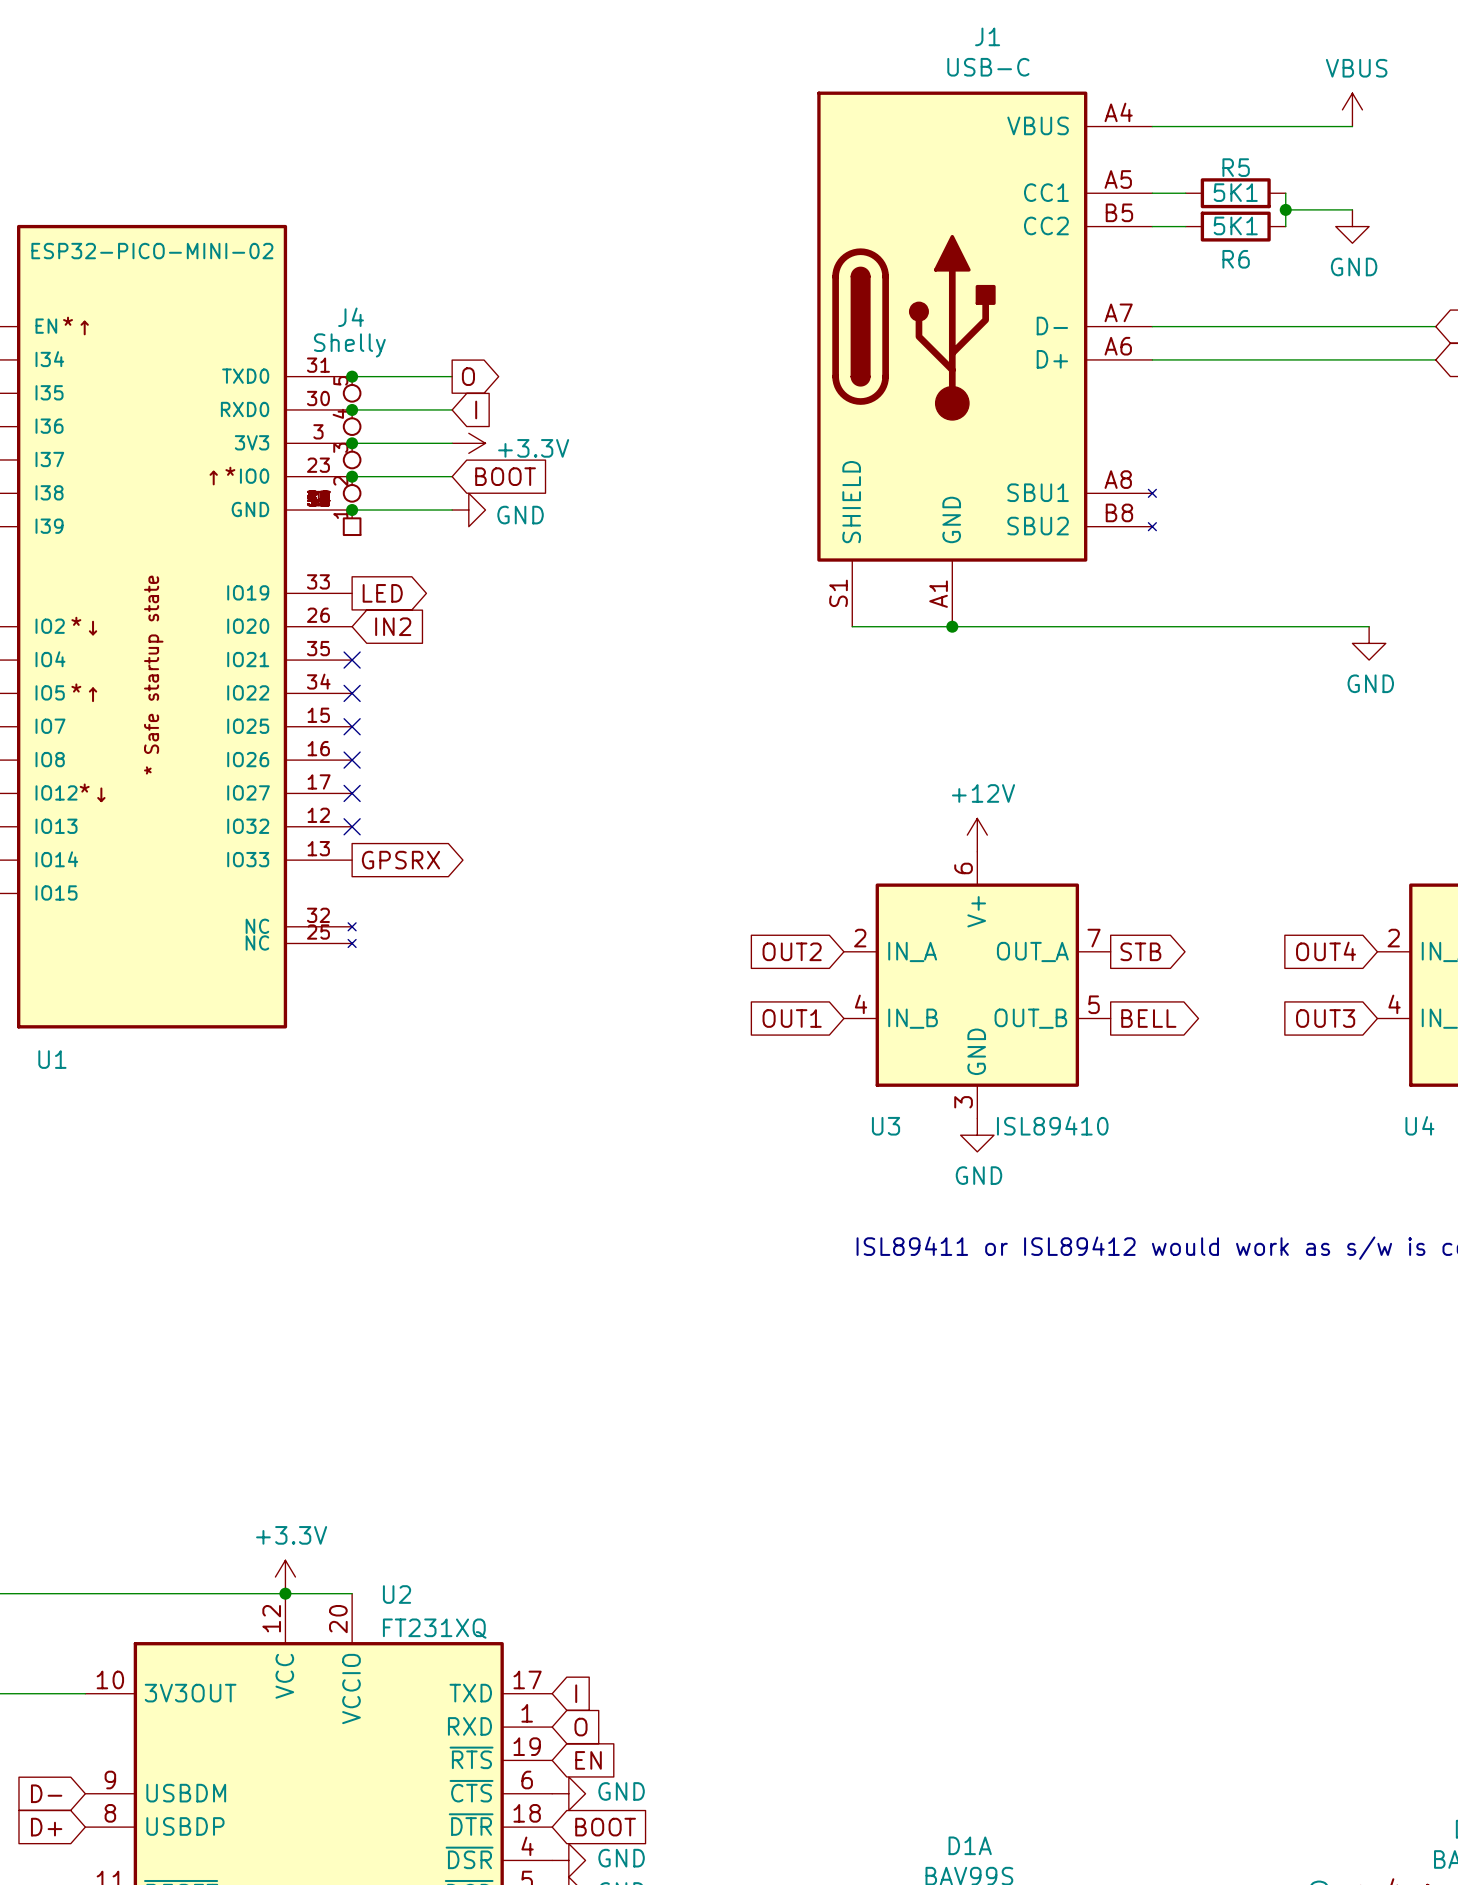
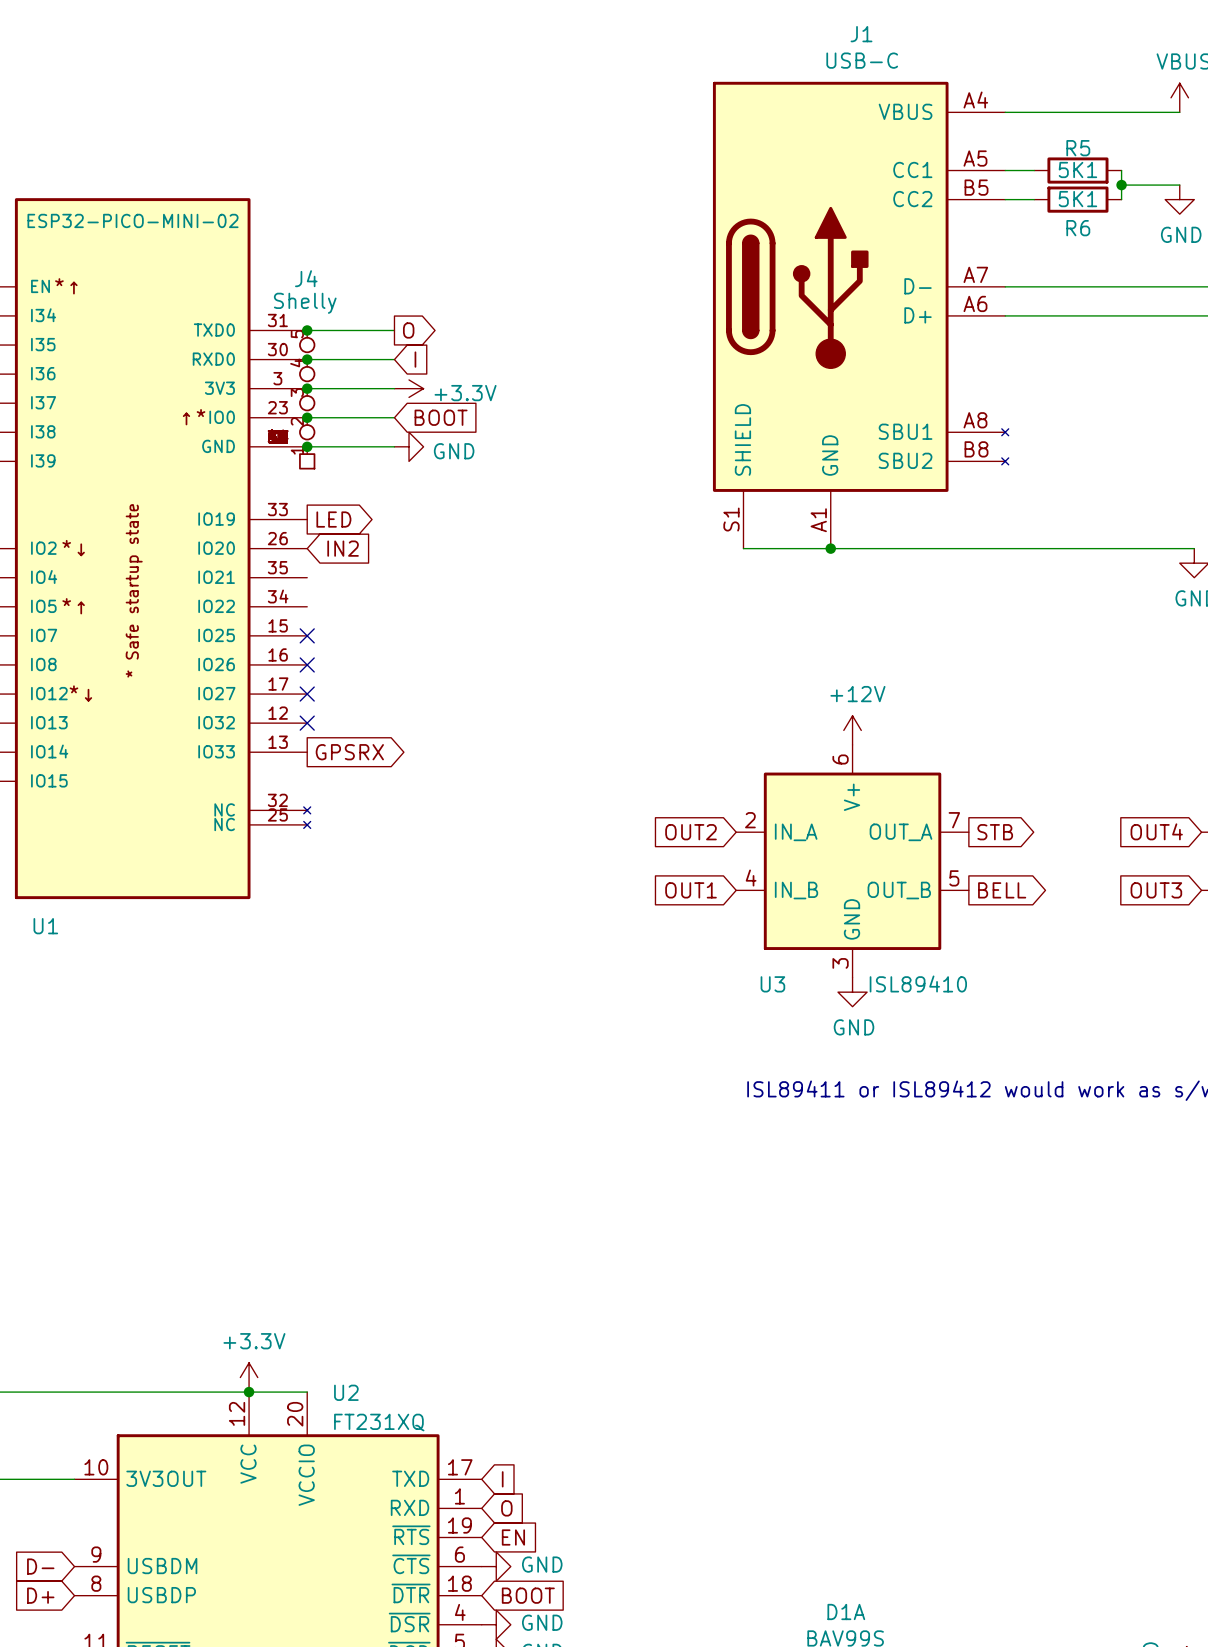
no-connect mark: (352, 660) -> none
no-connect mark: (352, 693) -> none

